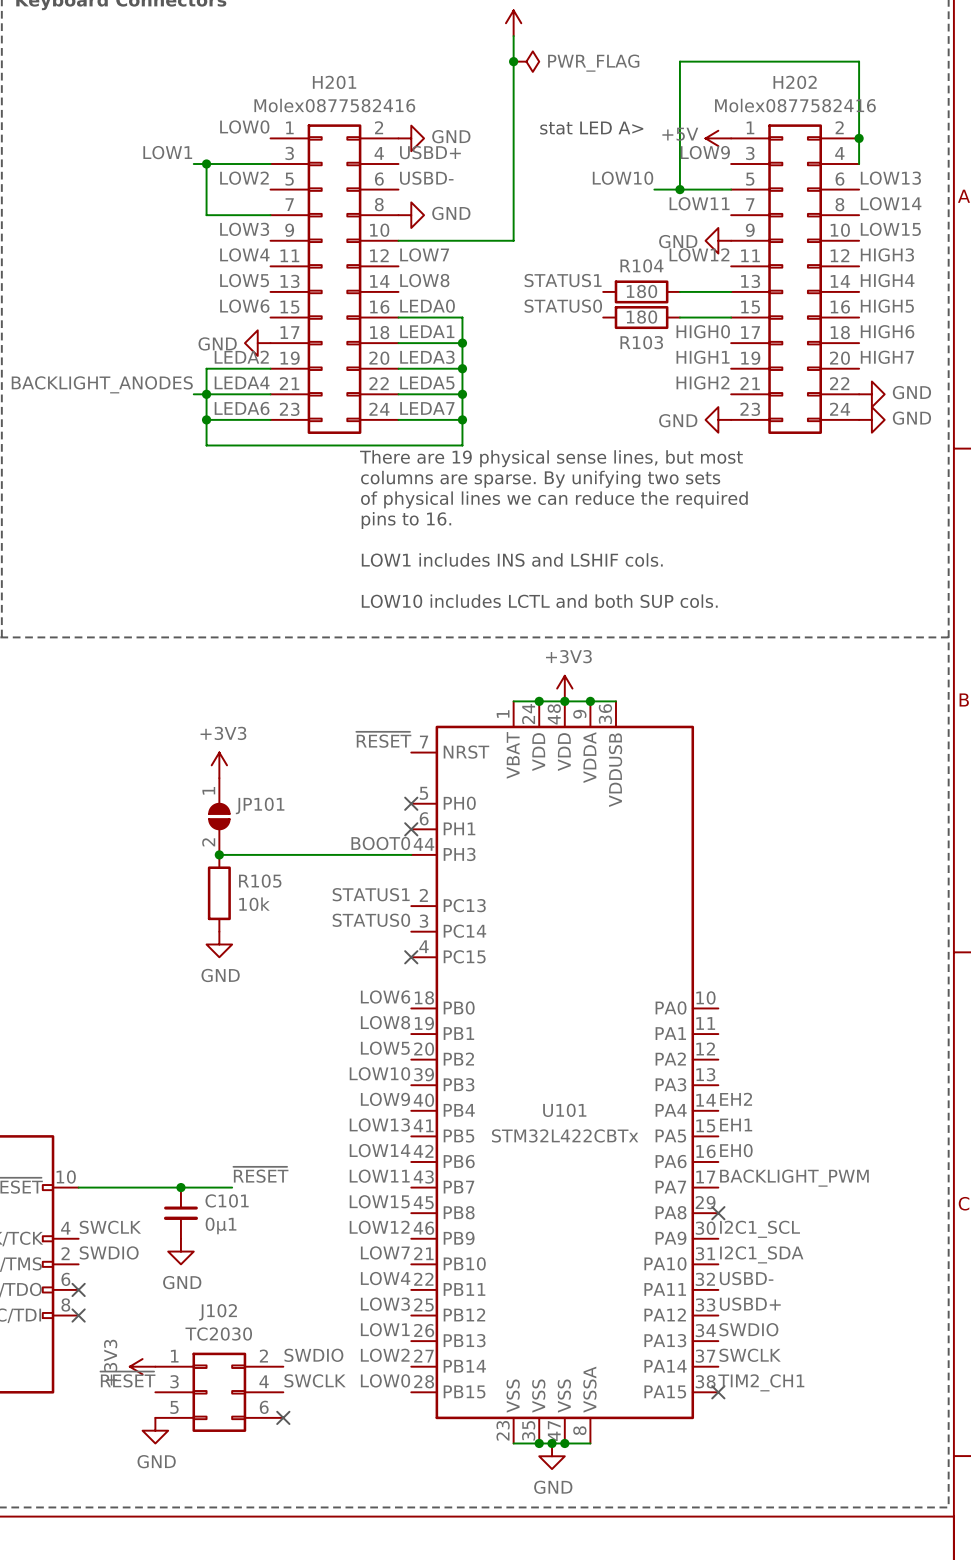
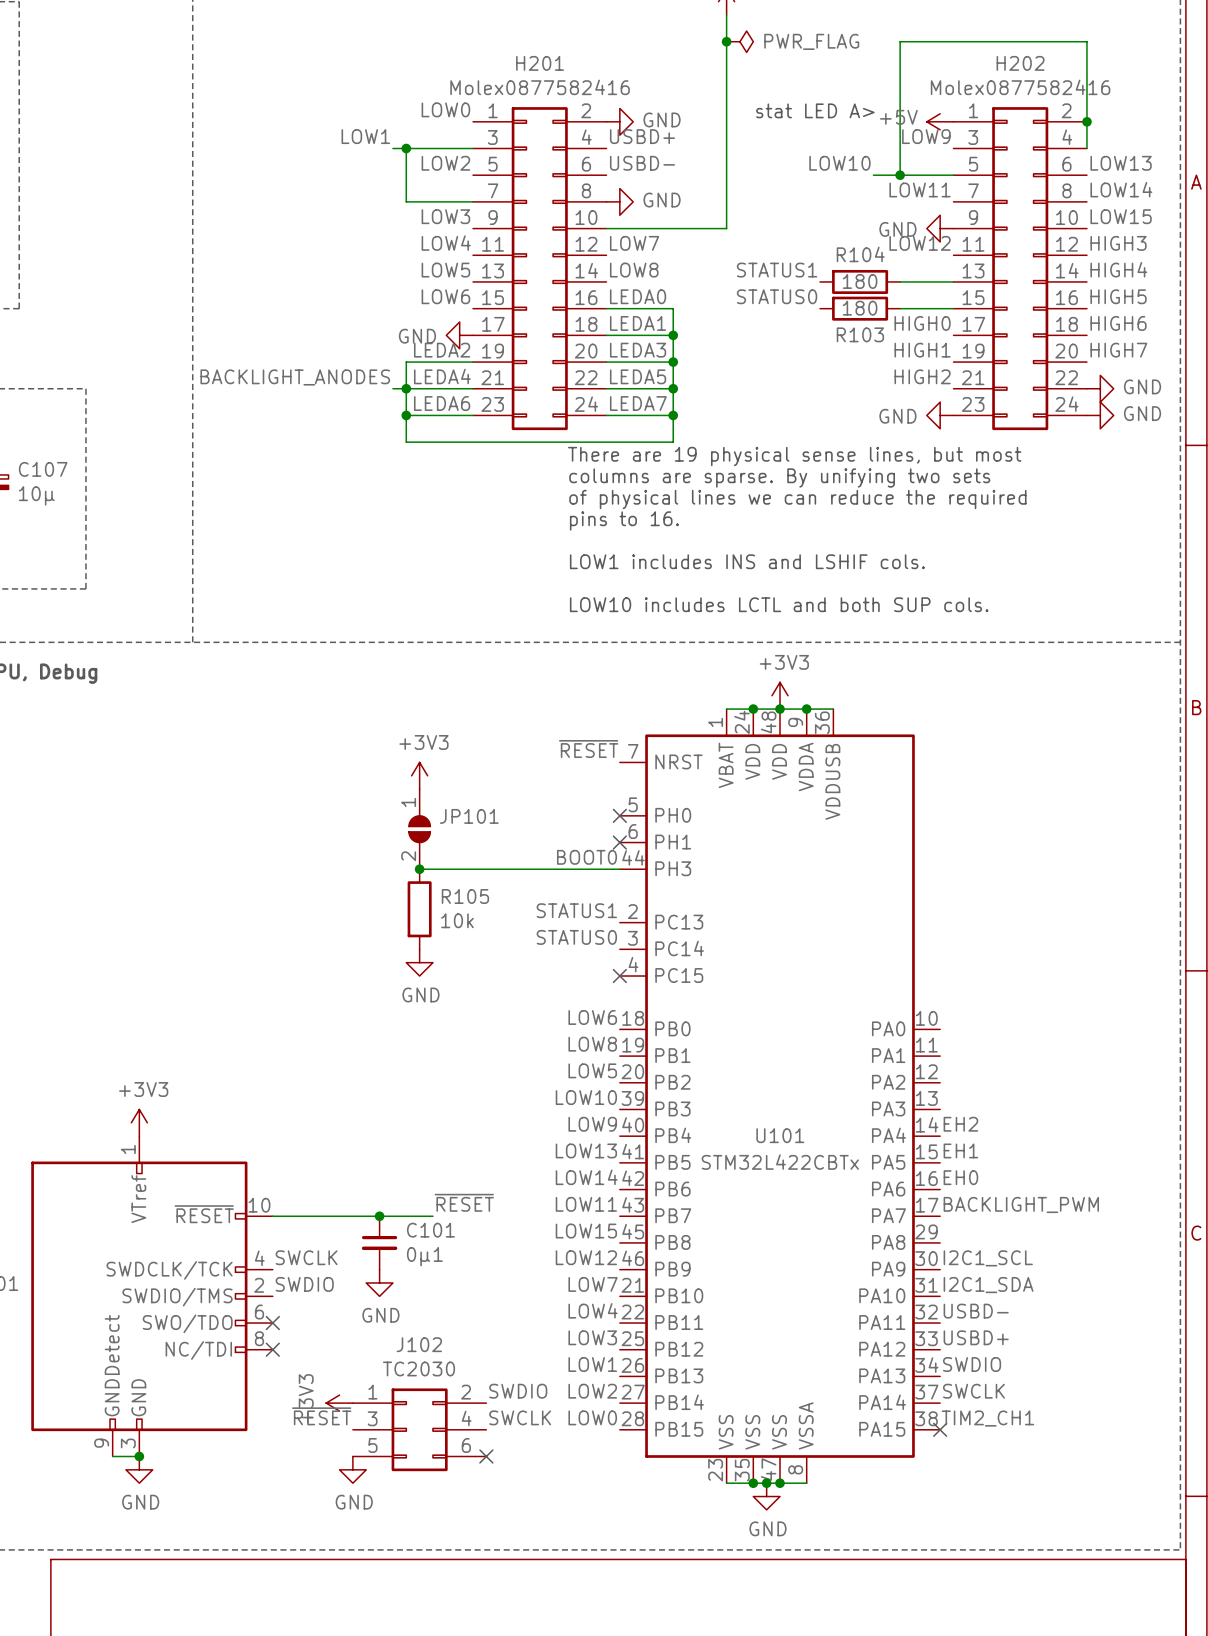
no-connect mark: (718, 1213) -> none

